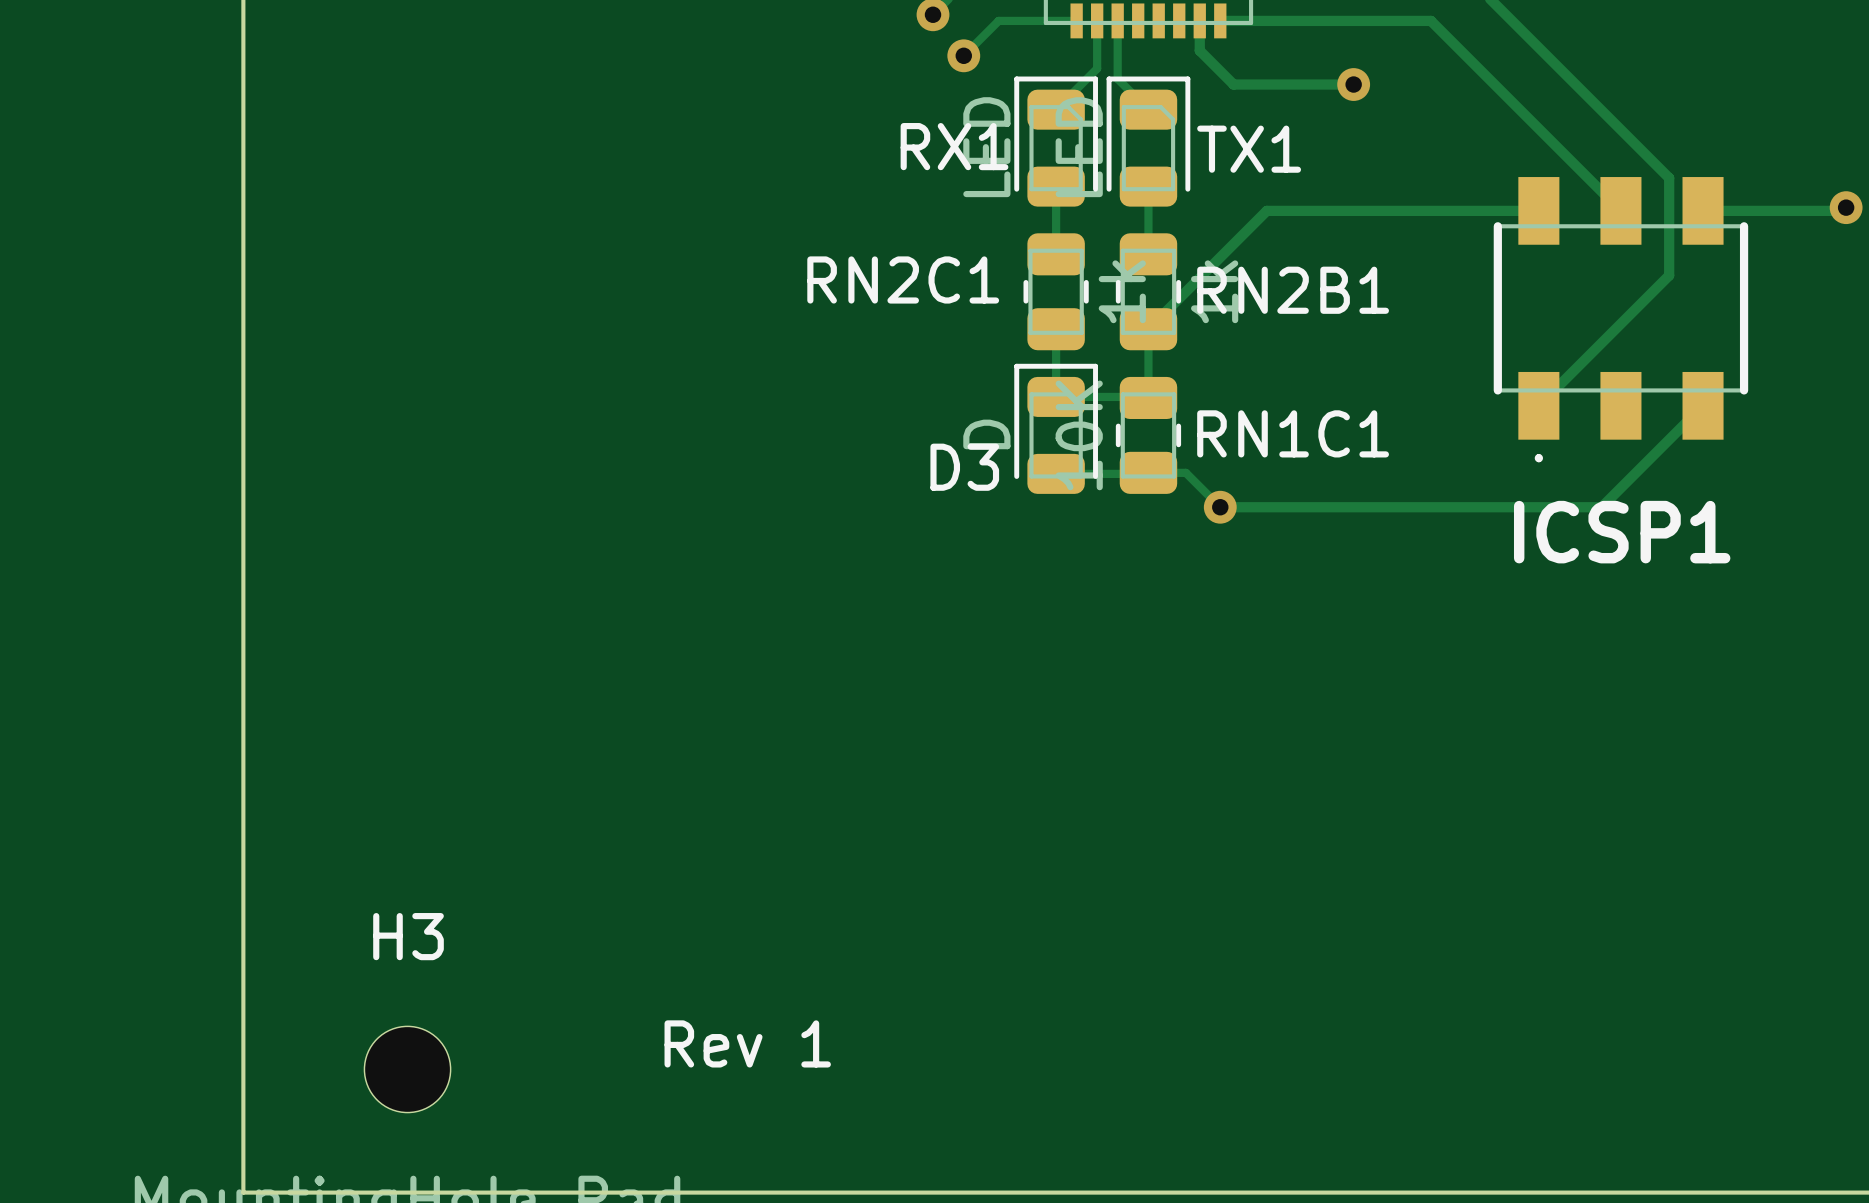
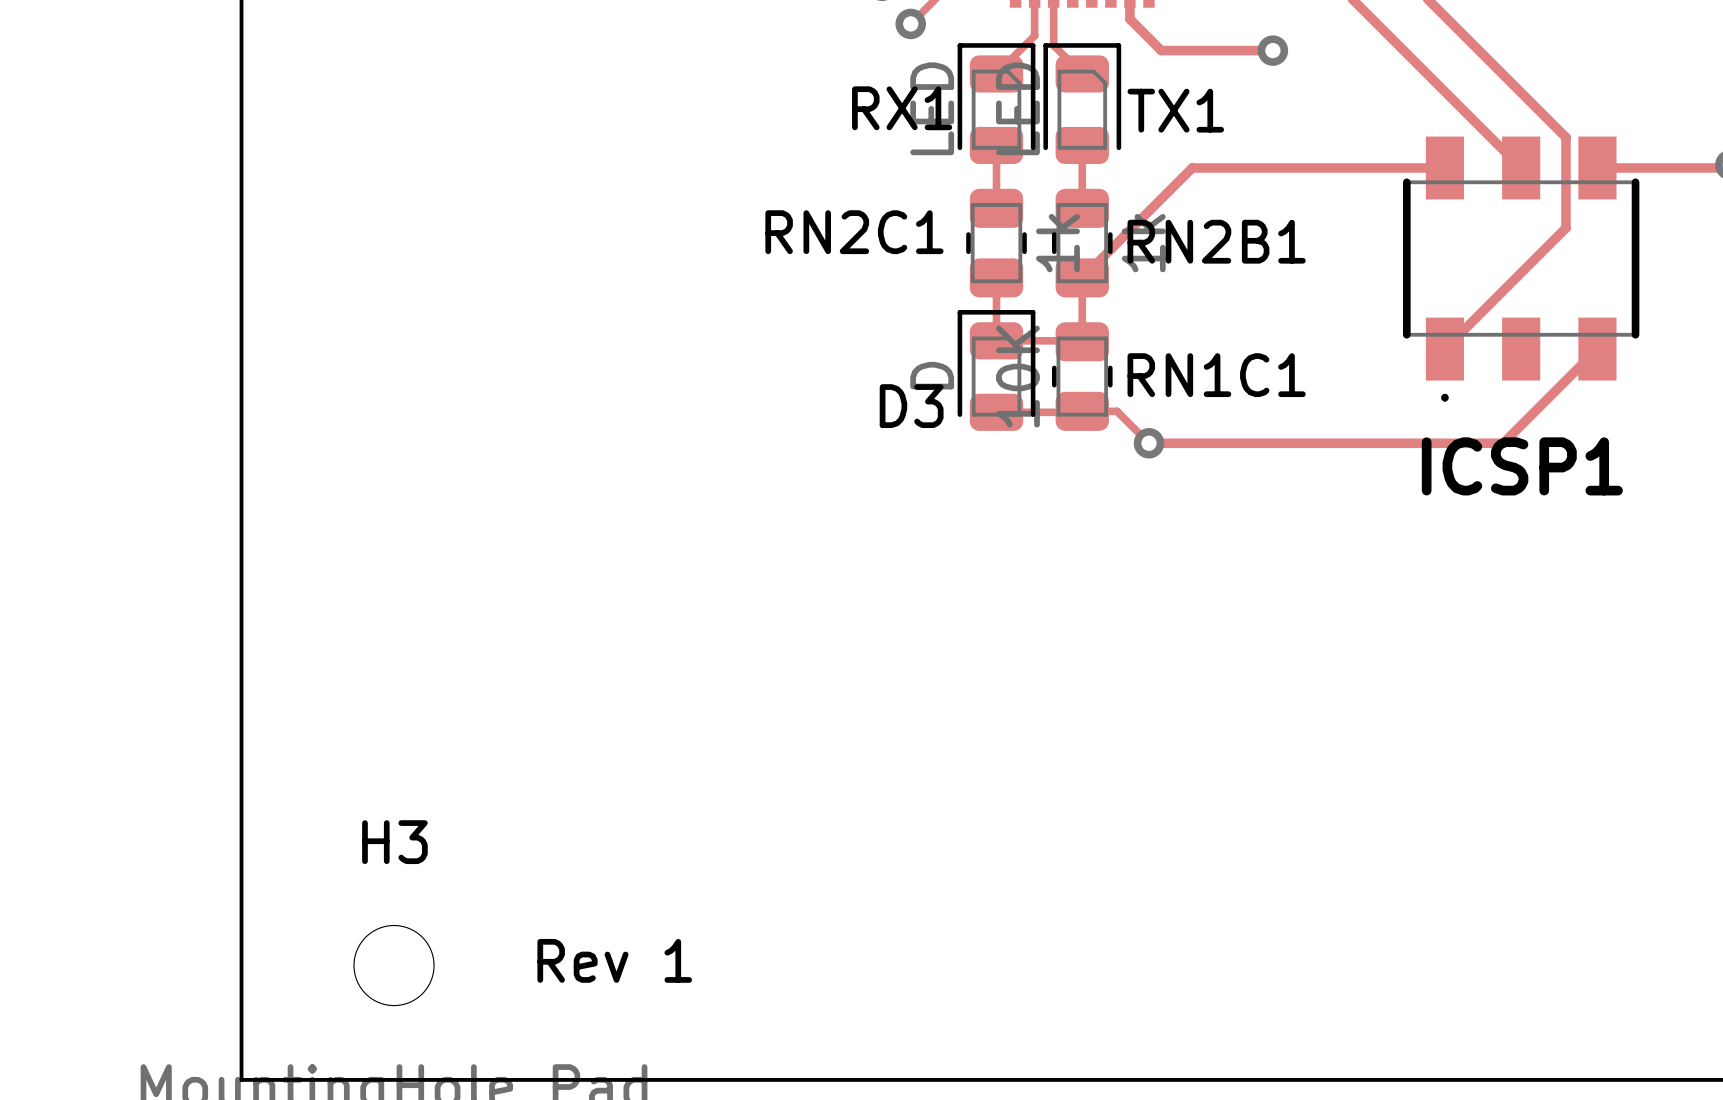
text position: Rev 1 (747, 1043) -> Rev 1 (614, 960)

